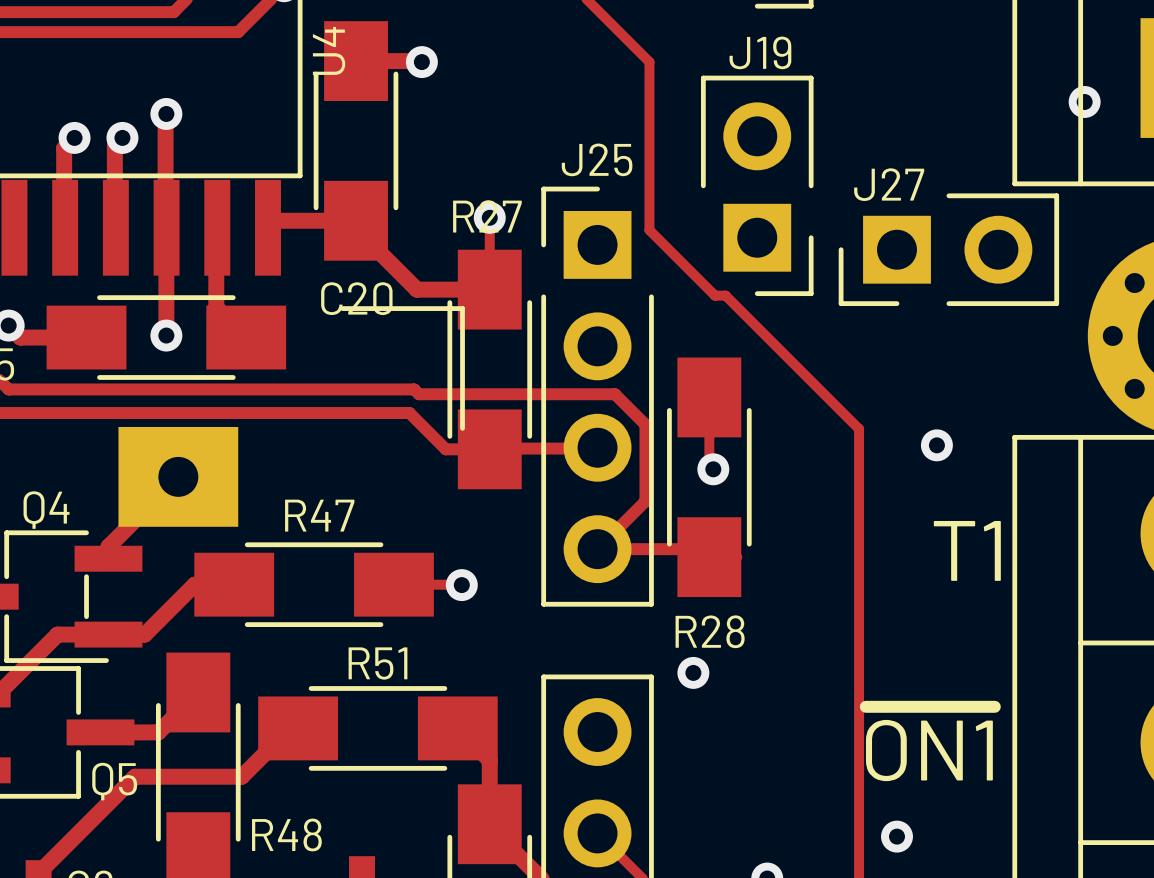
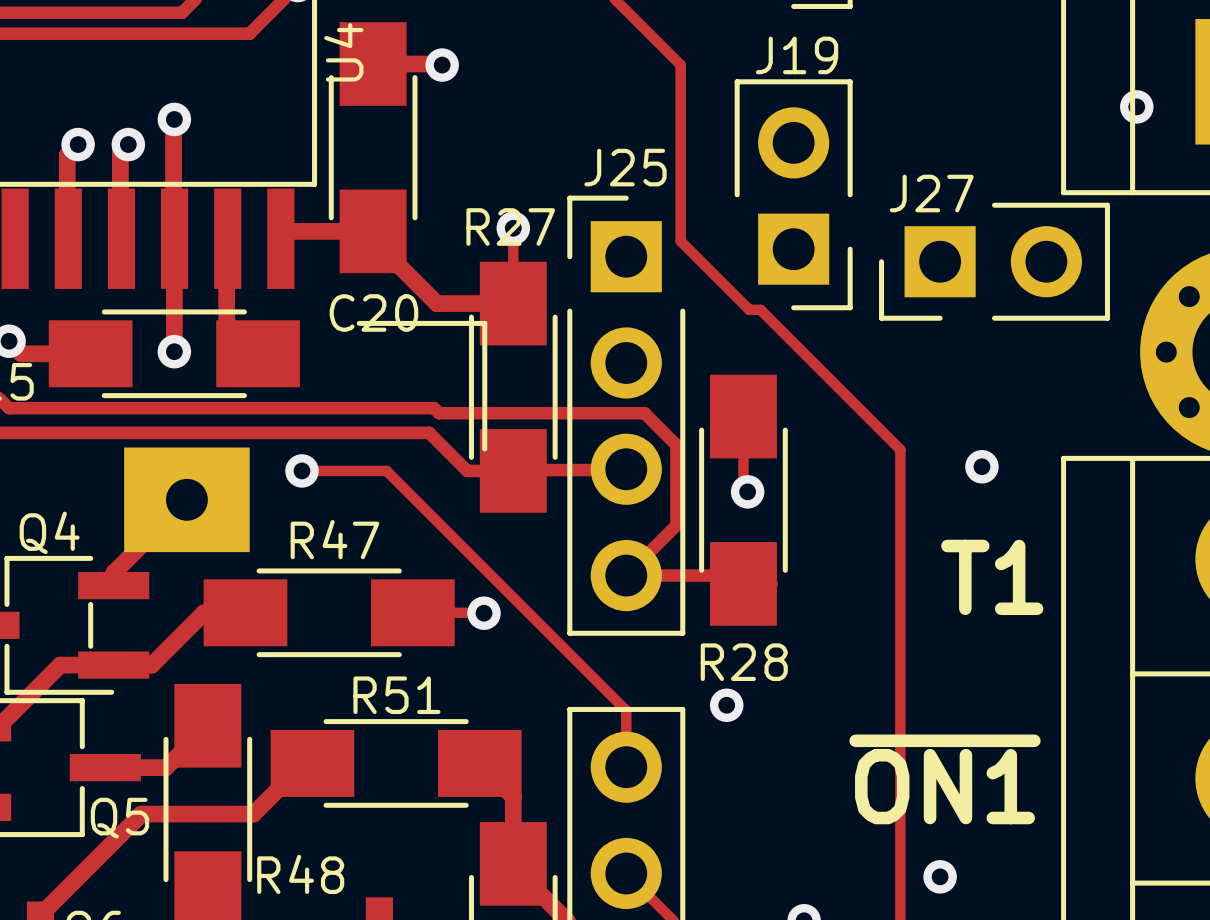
track: none -> (301, 470) (386, 470) (626, 710) (626, 767)
via: none -> (301, 470)

